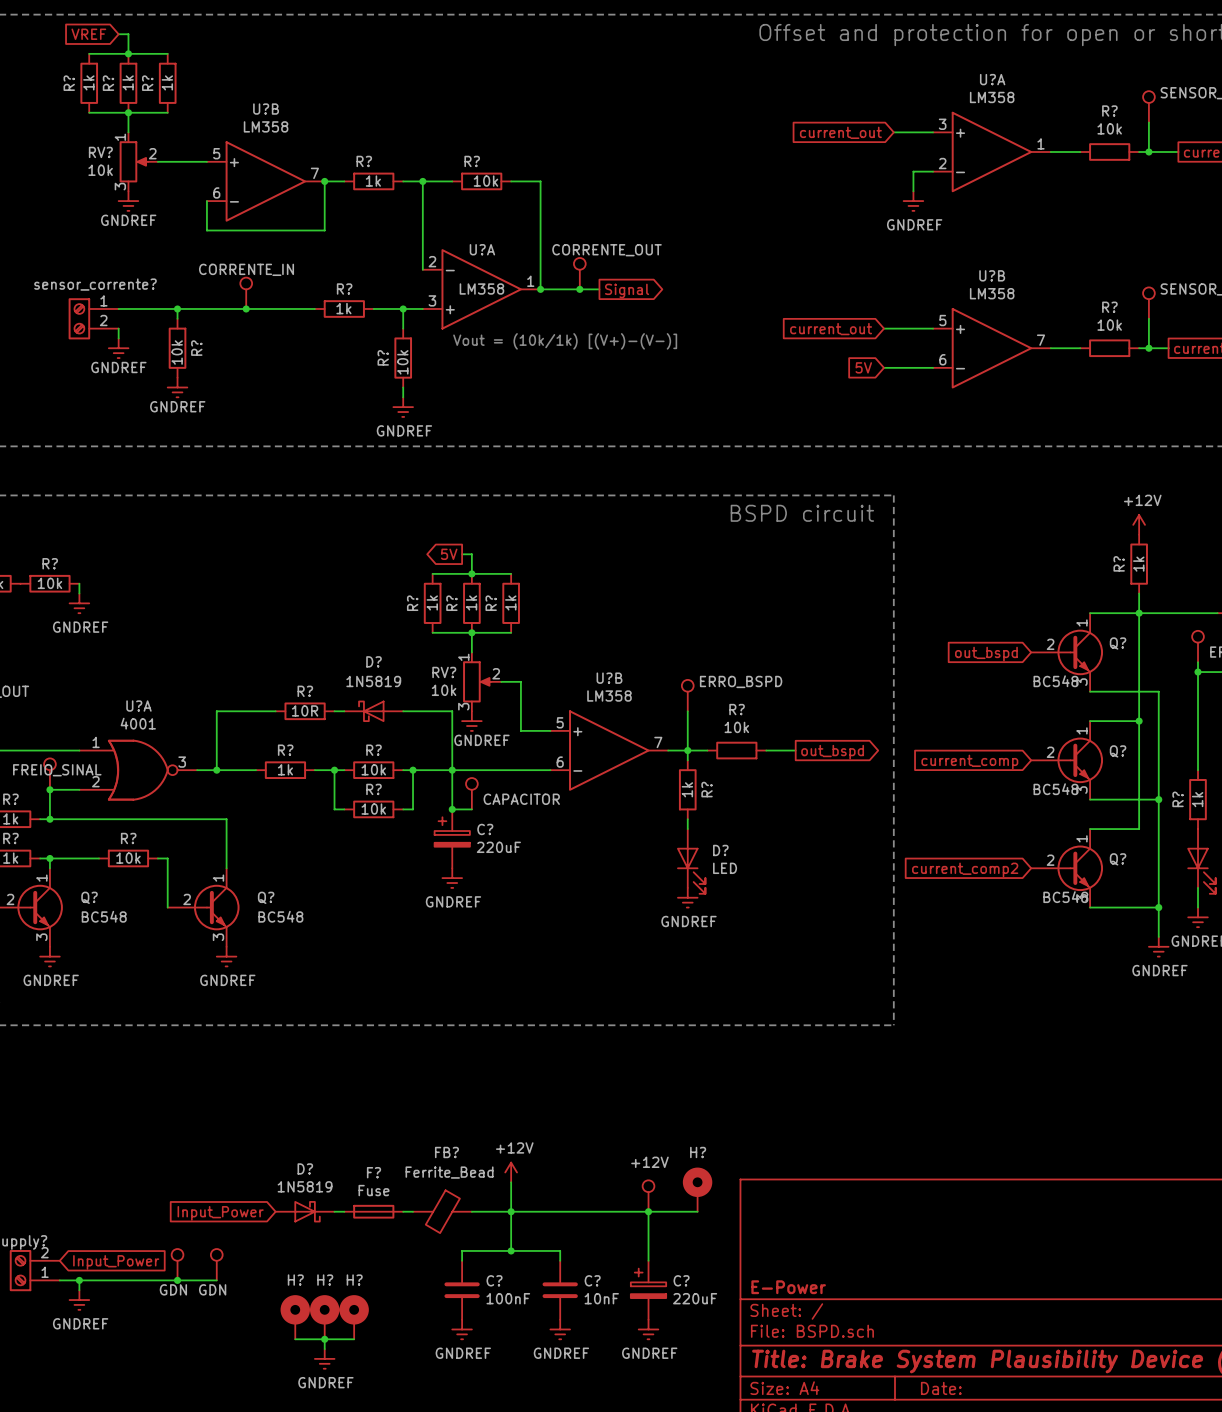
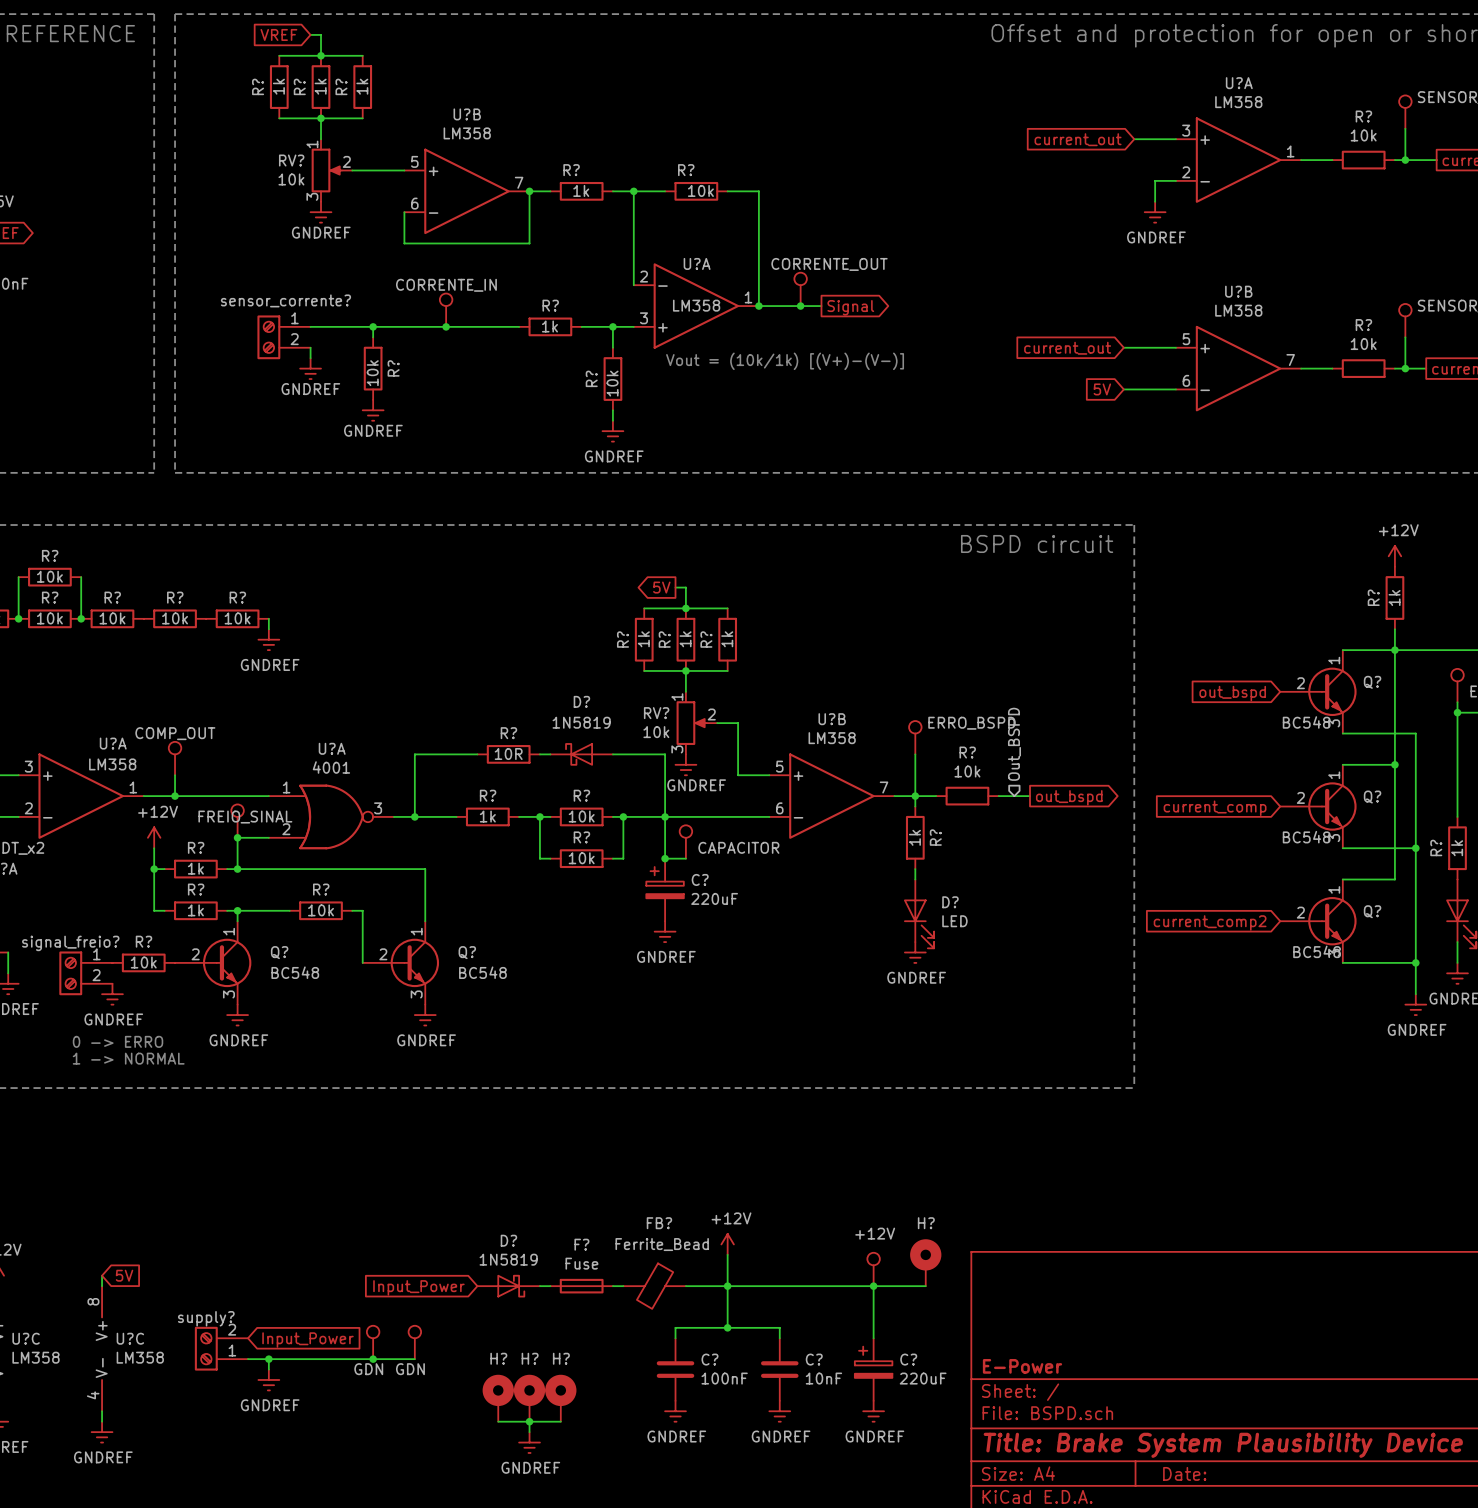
hierarchical label: none -> Out_BSPD (1014, 744)

